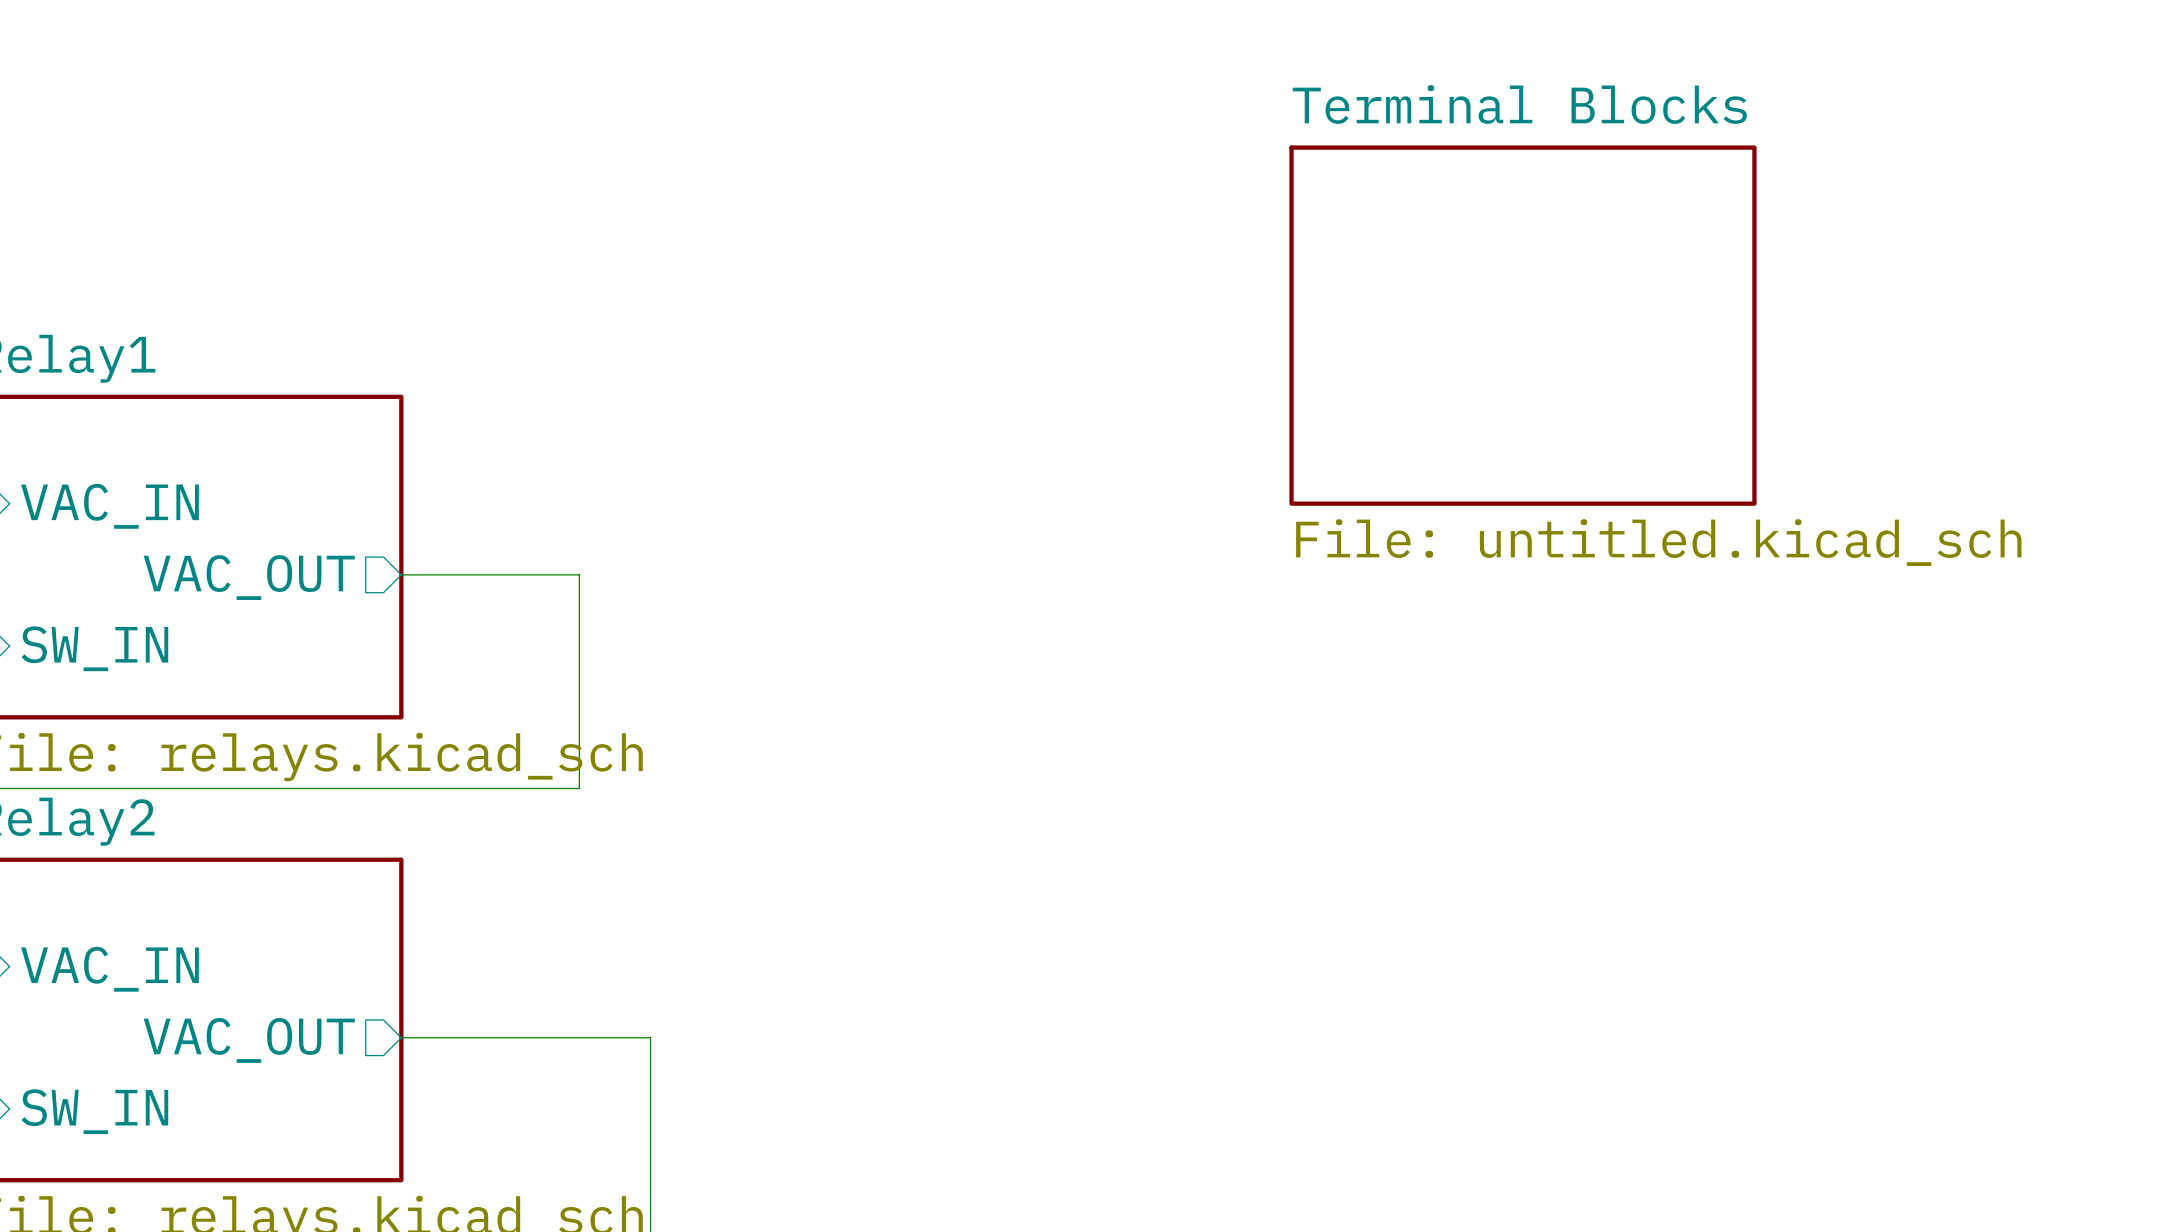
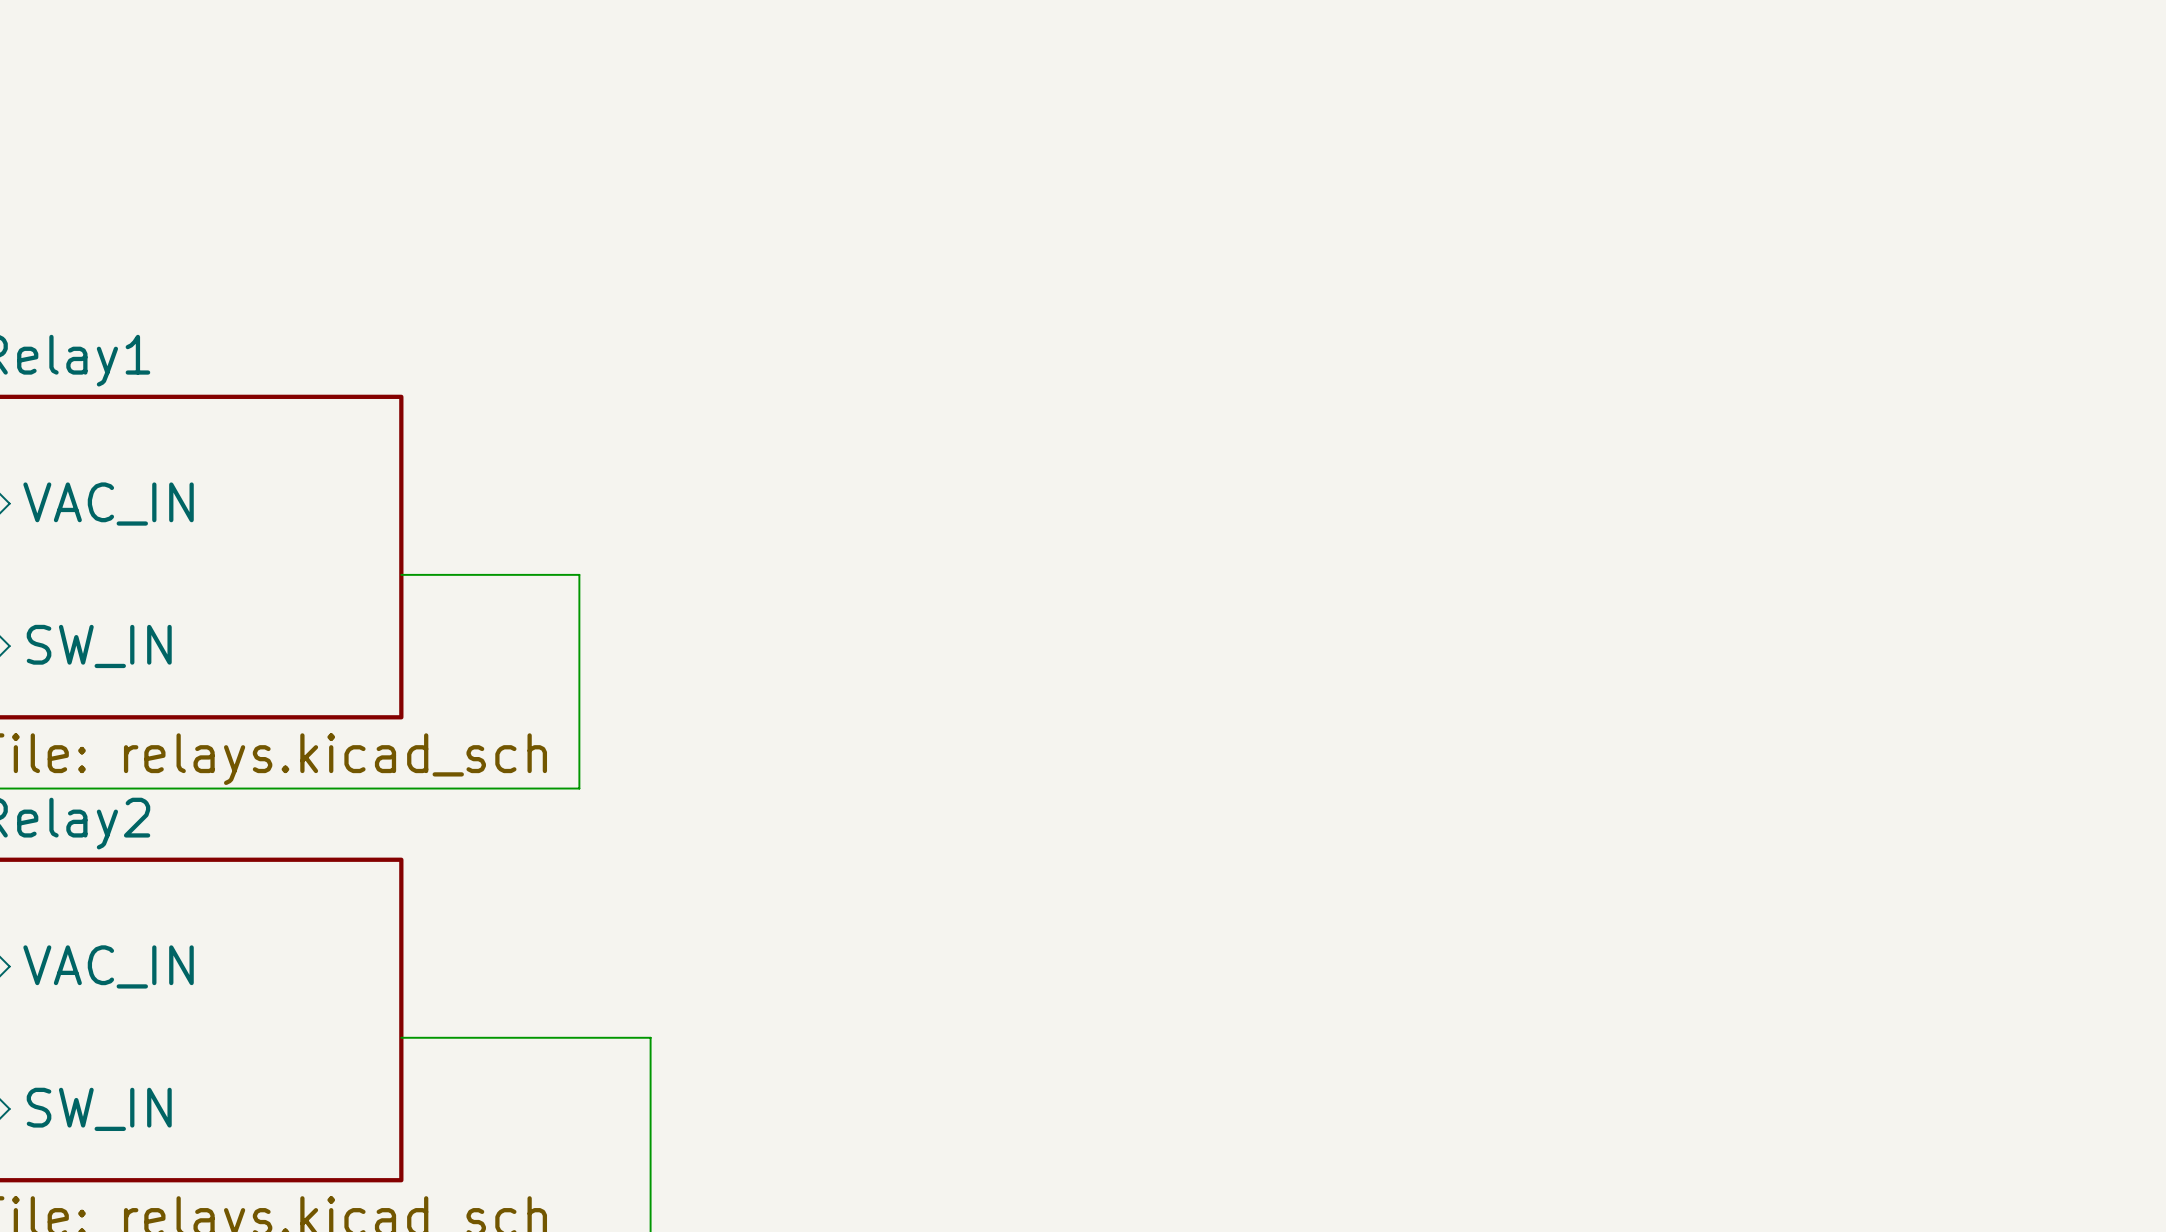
sheet Terminal Blocks: File: untitled.kicad_sch (1522, 325) -> none
sheet pin: VAC_OUT (249, 577) -> none
sheet pin: VAC_OUT (249, 1040) -> none

